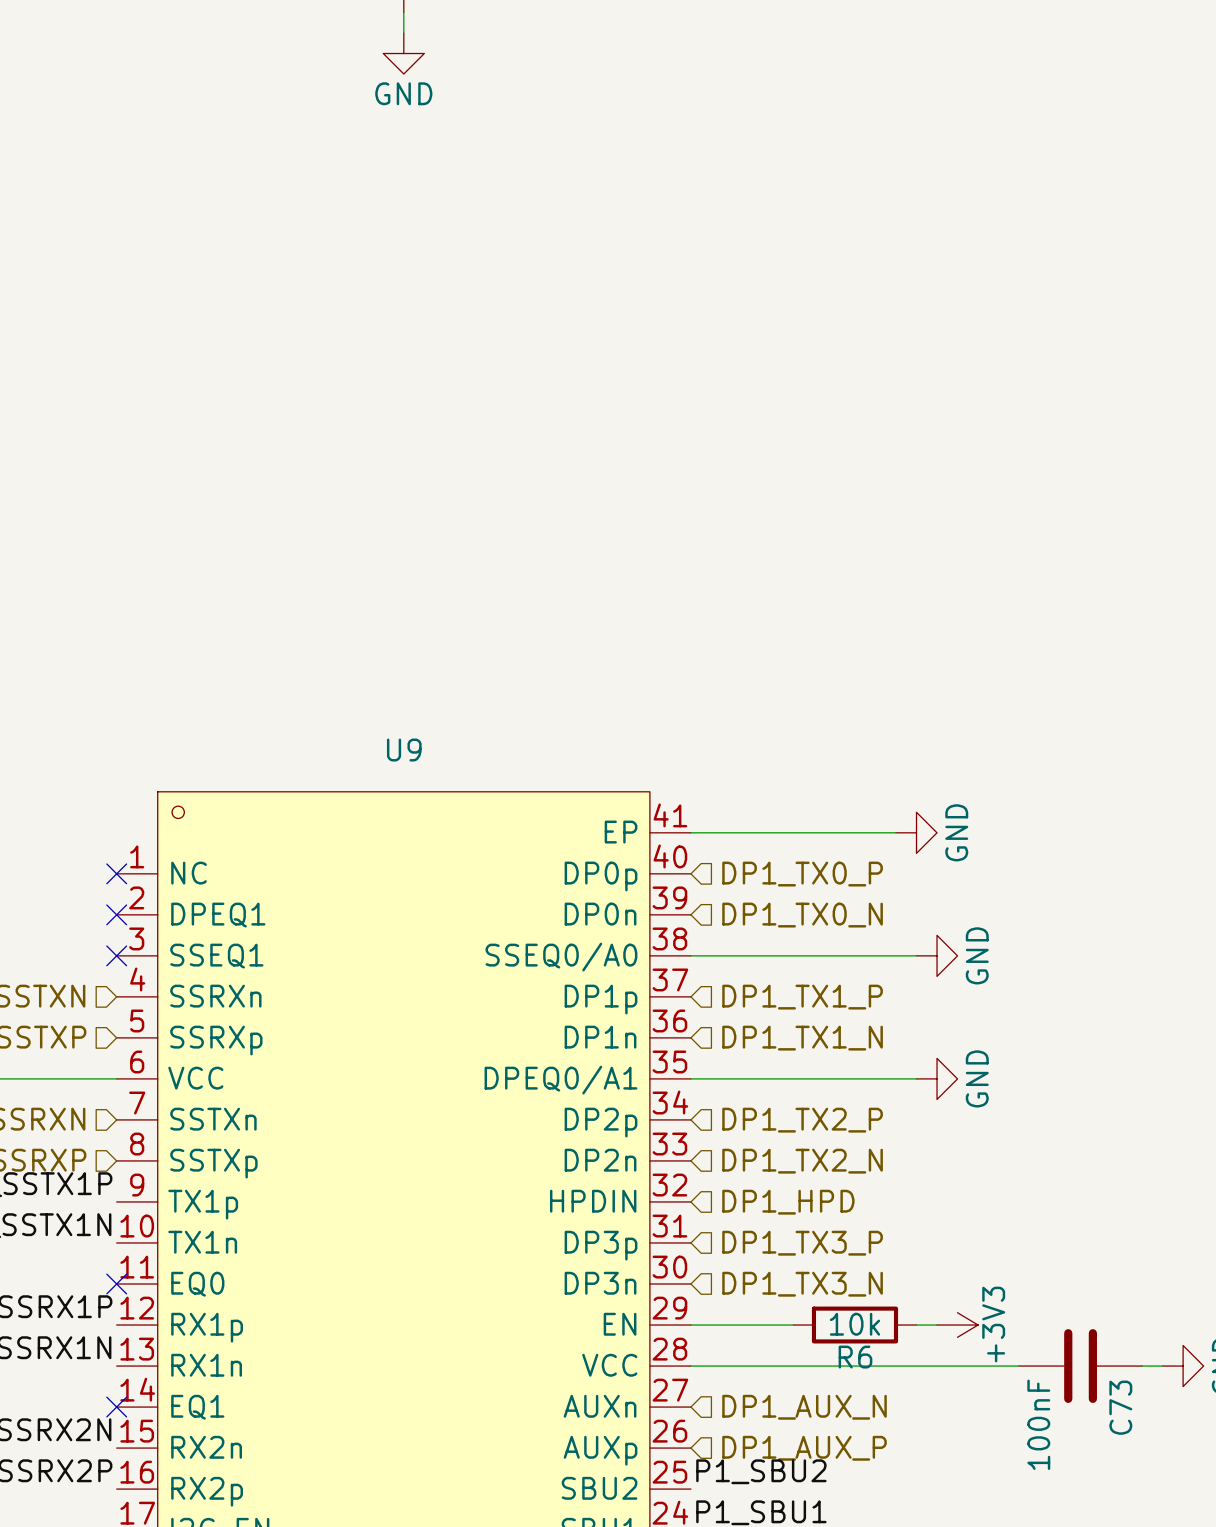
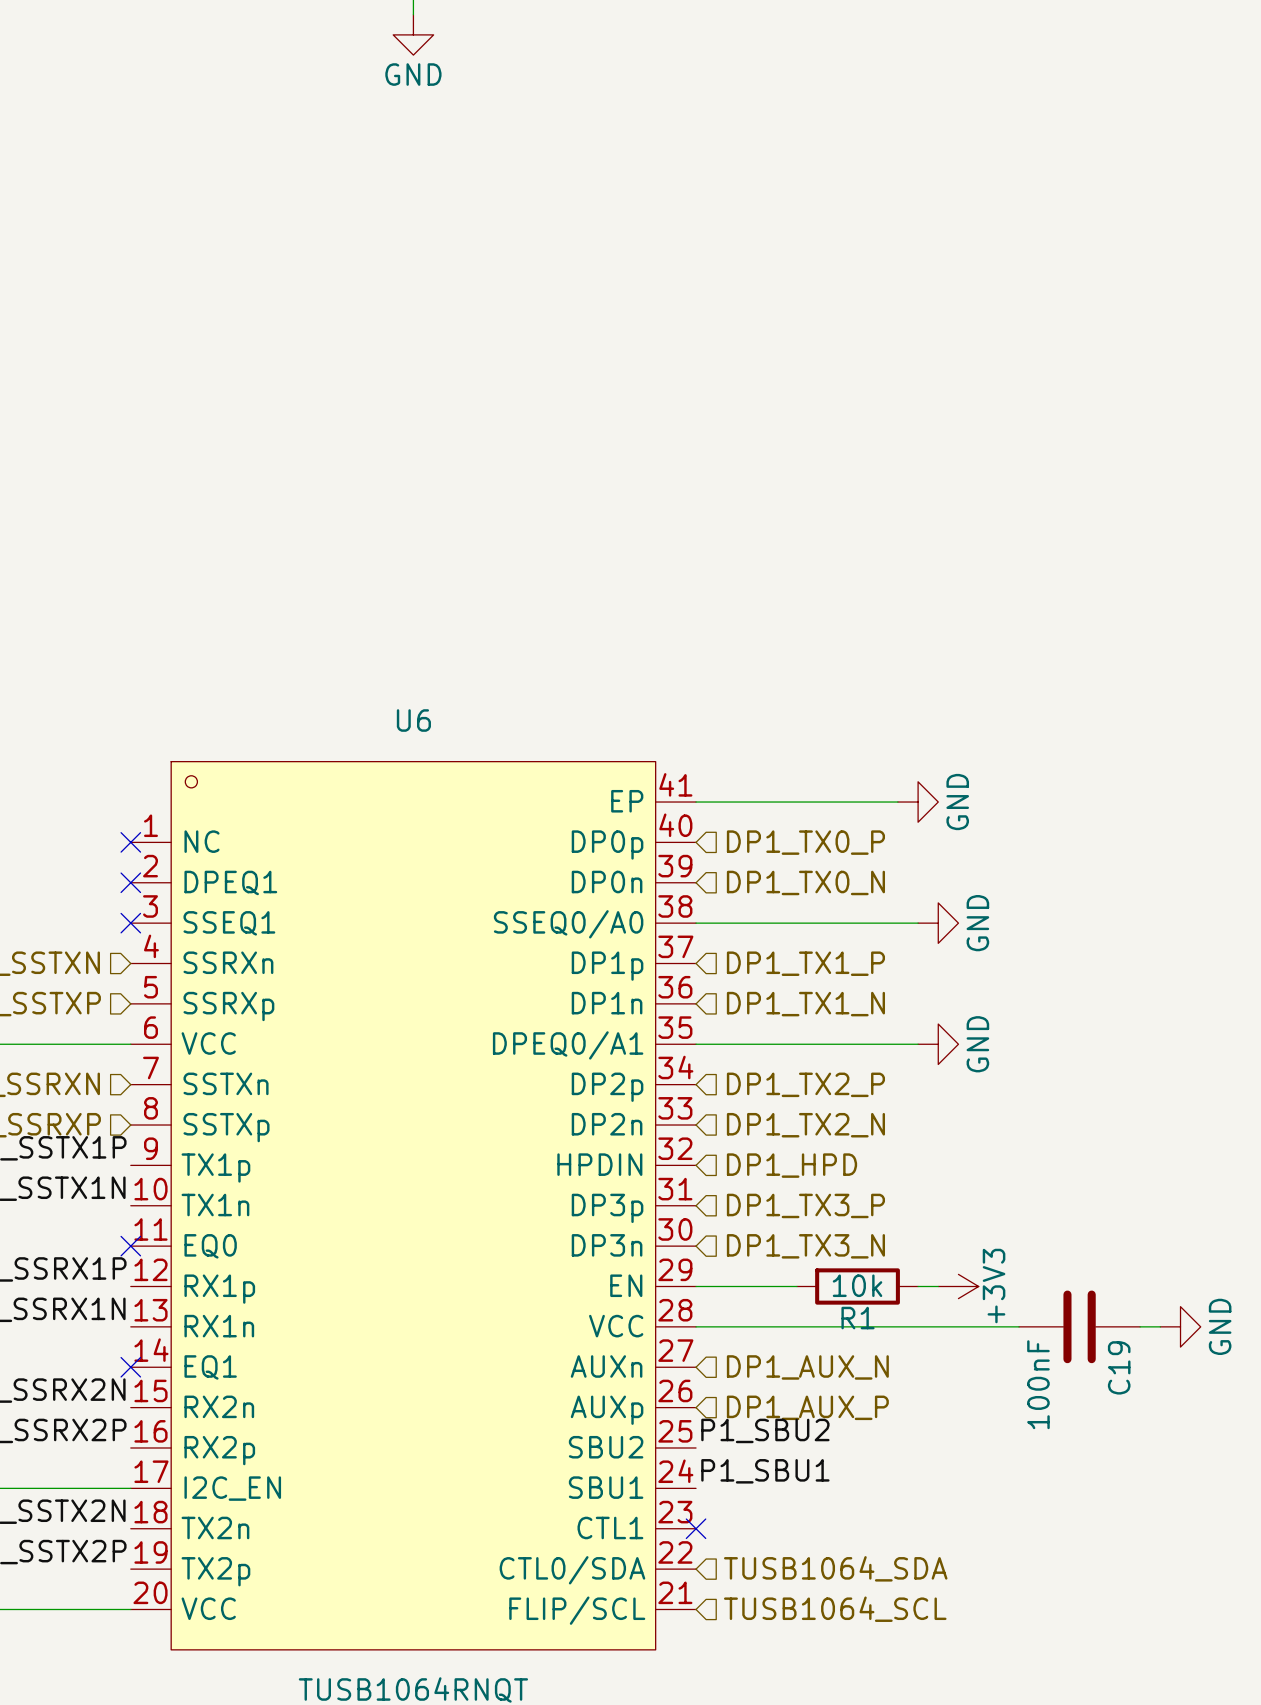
U9 name: U9 (404, 750) -> U6 (413, 720)
R6 name: R6 (855, 1357) -> R1 (858, 1318)
C73 name: C73 (1120, 1407) -> C19 (1119, 1367)

